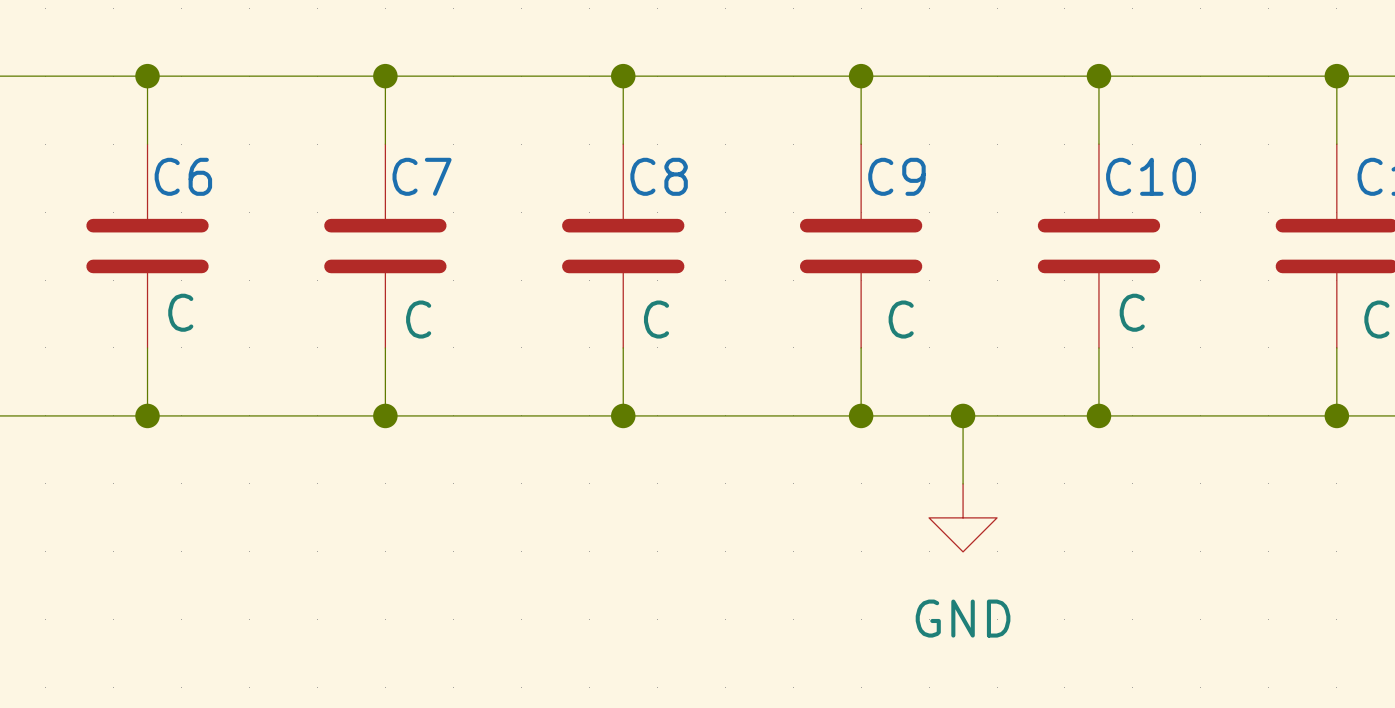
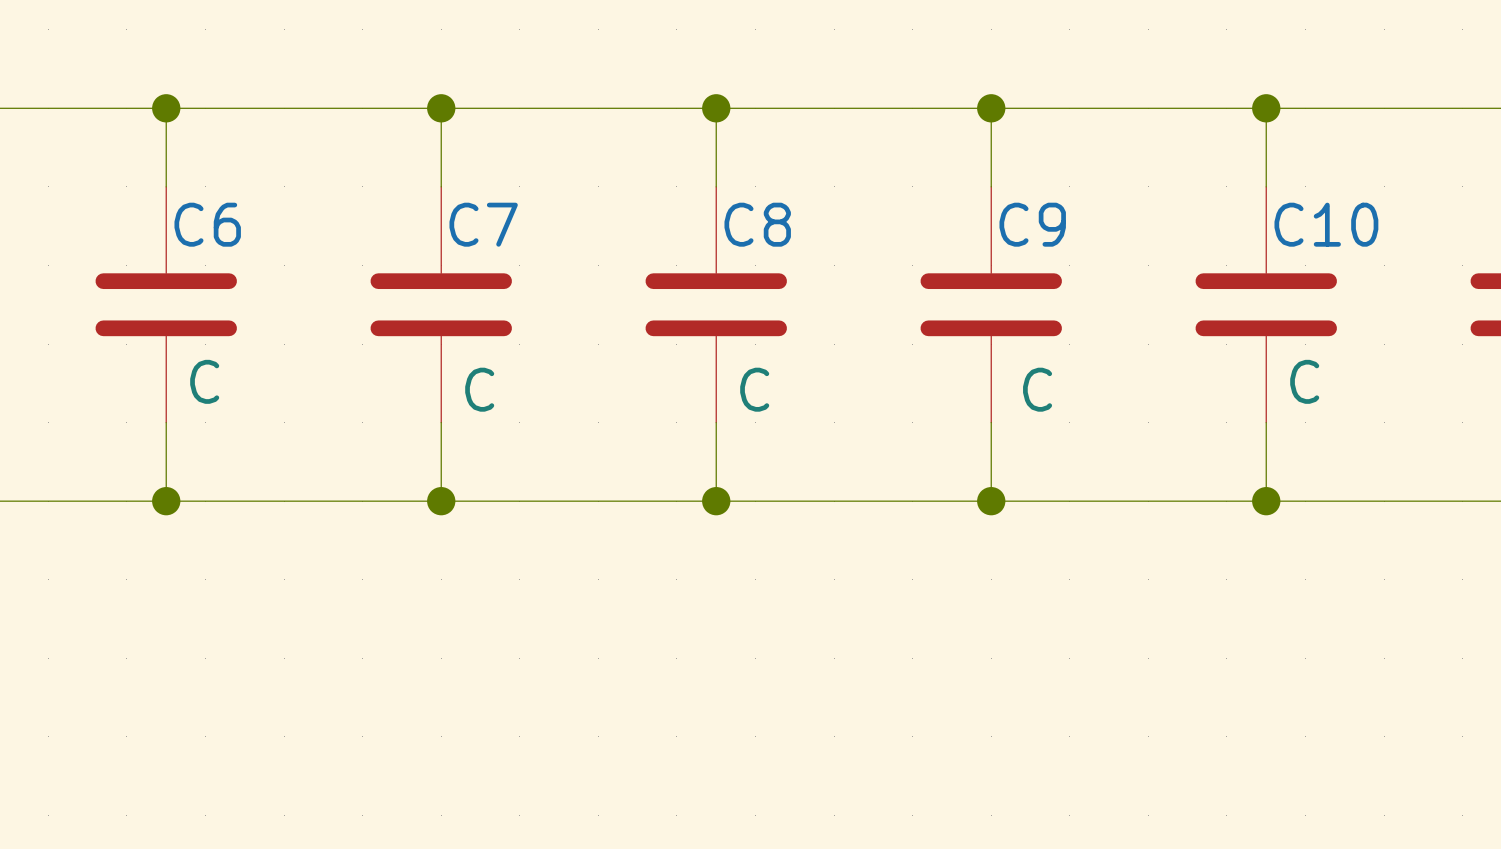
wire: (963, 415) (963, 483) -> none
junction: (963, 415) -> none
power symbol: GND (963, 517) -> none

